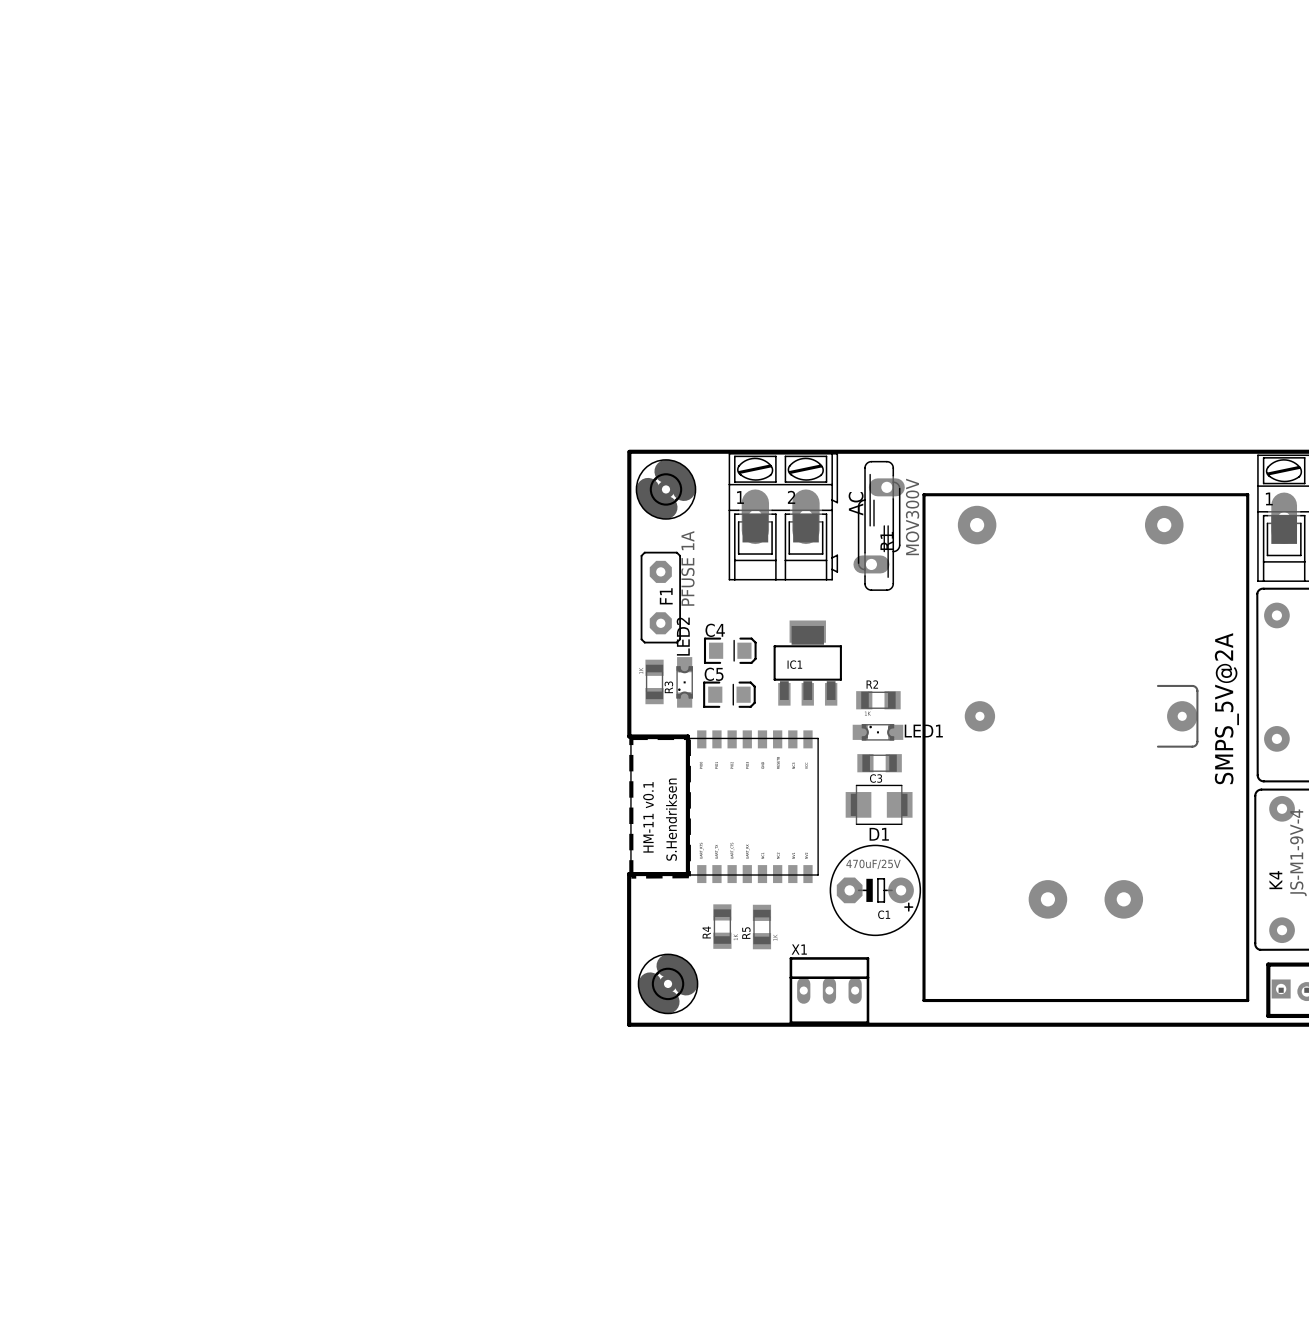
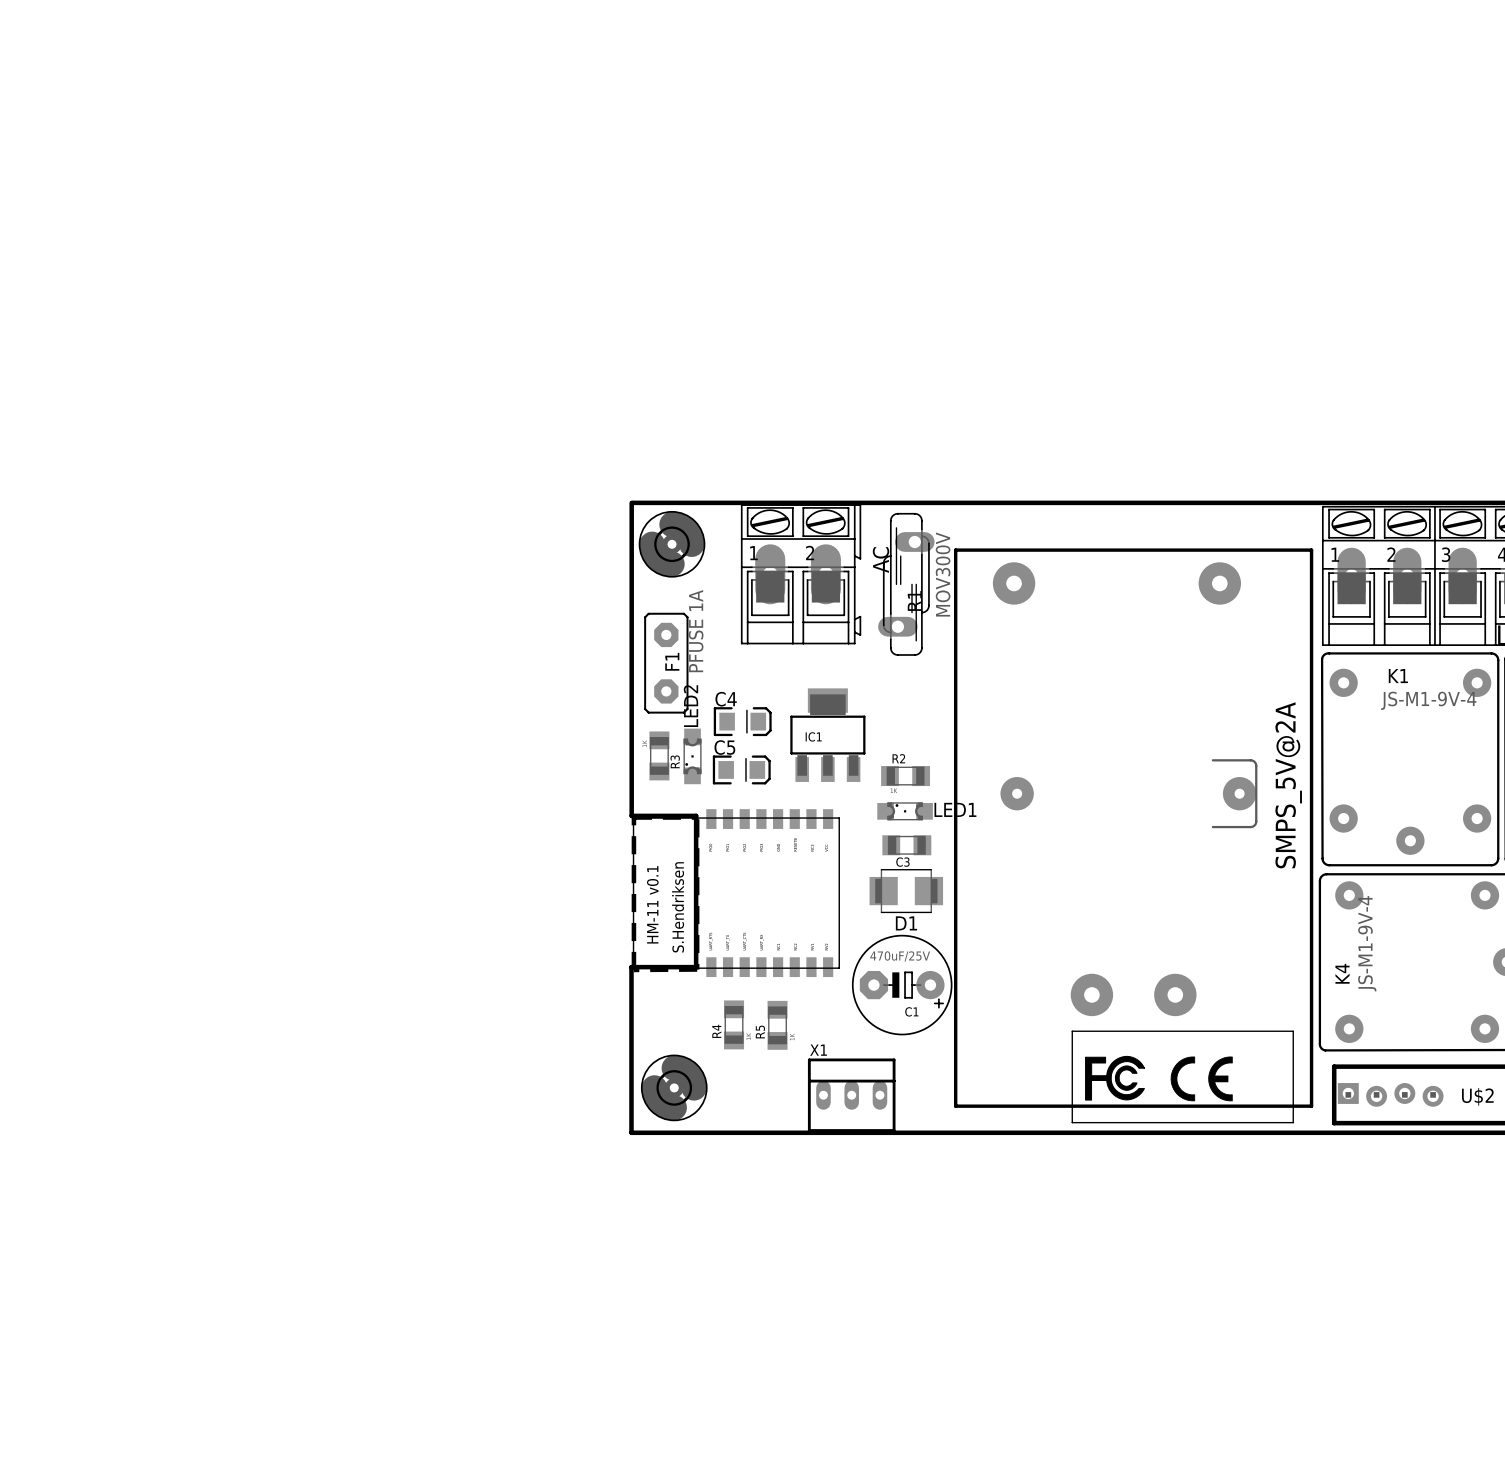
drawing: none -> [1071, 1030, 1294, 1124]

